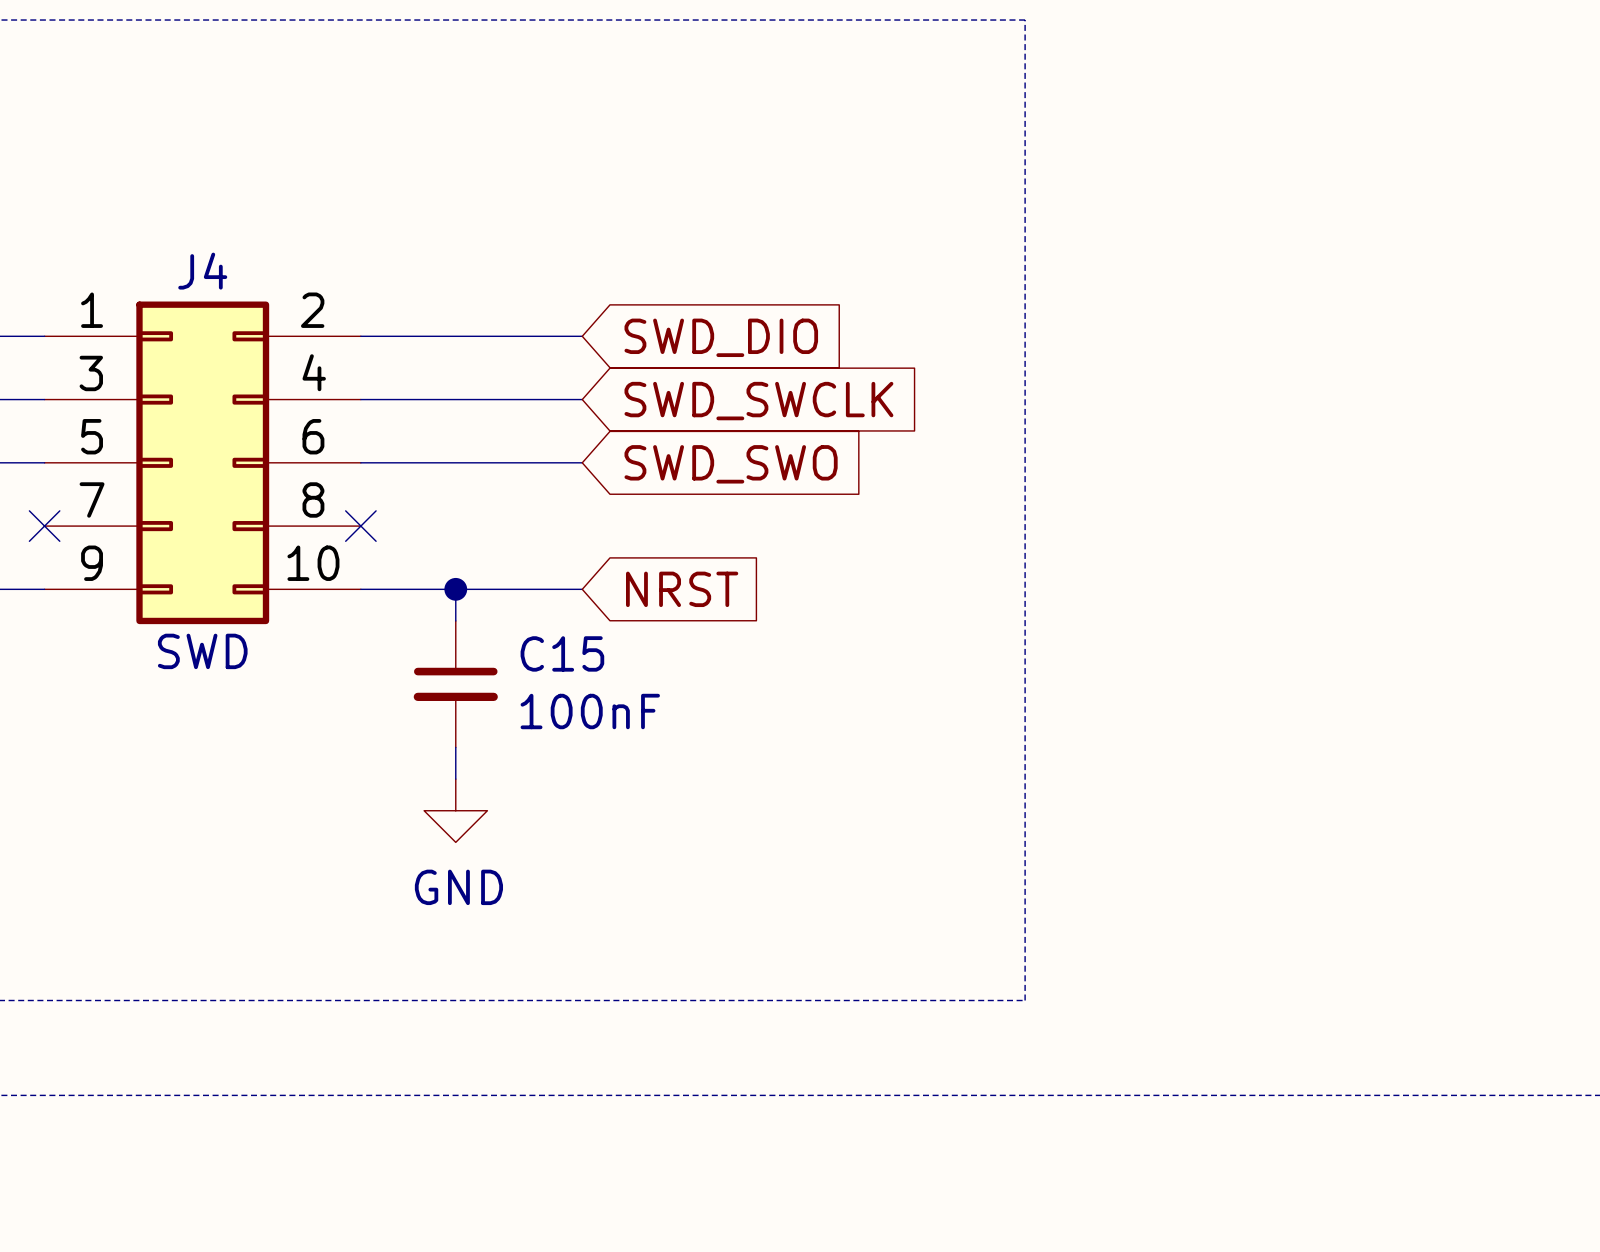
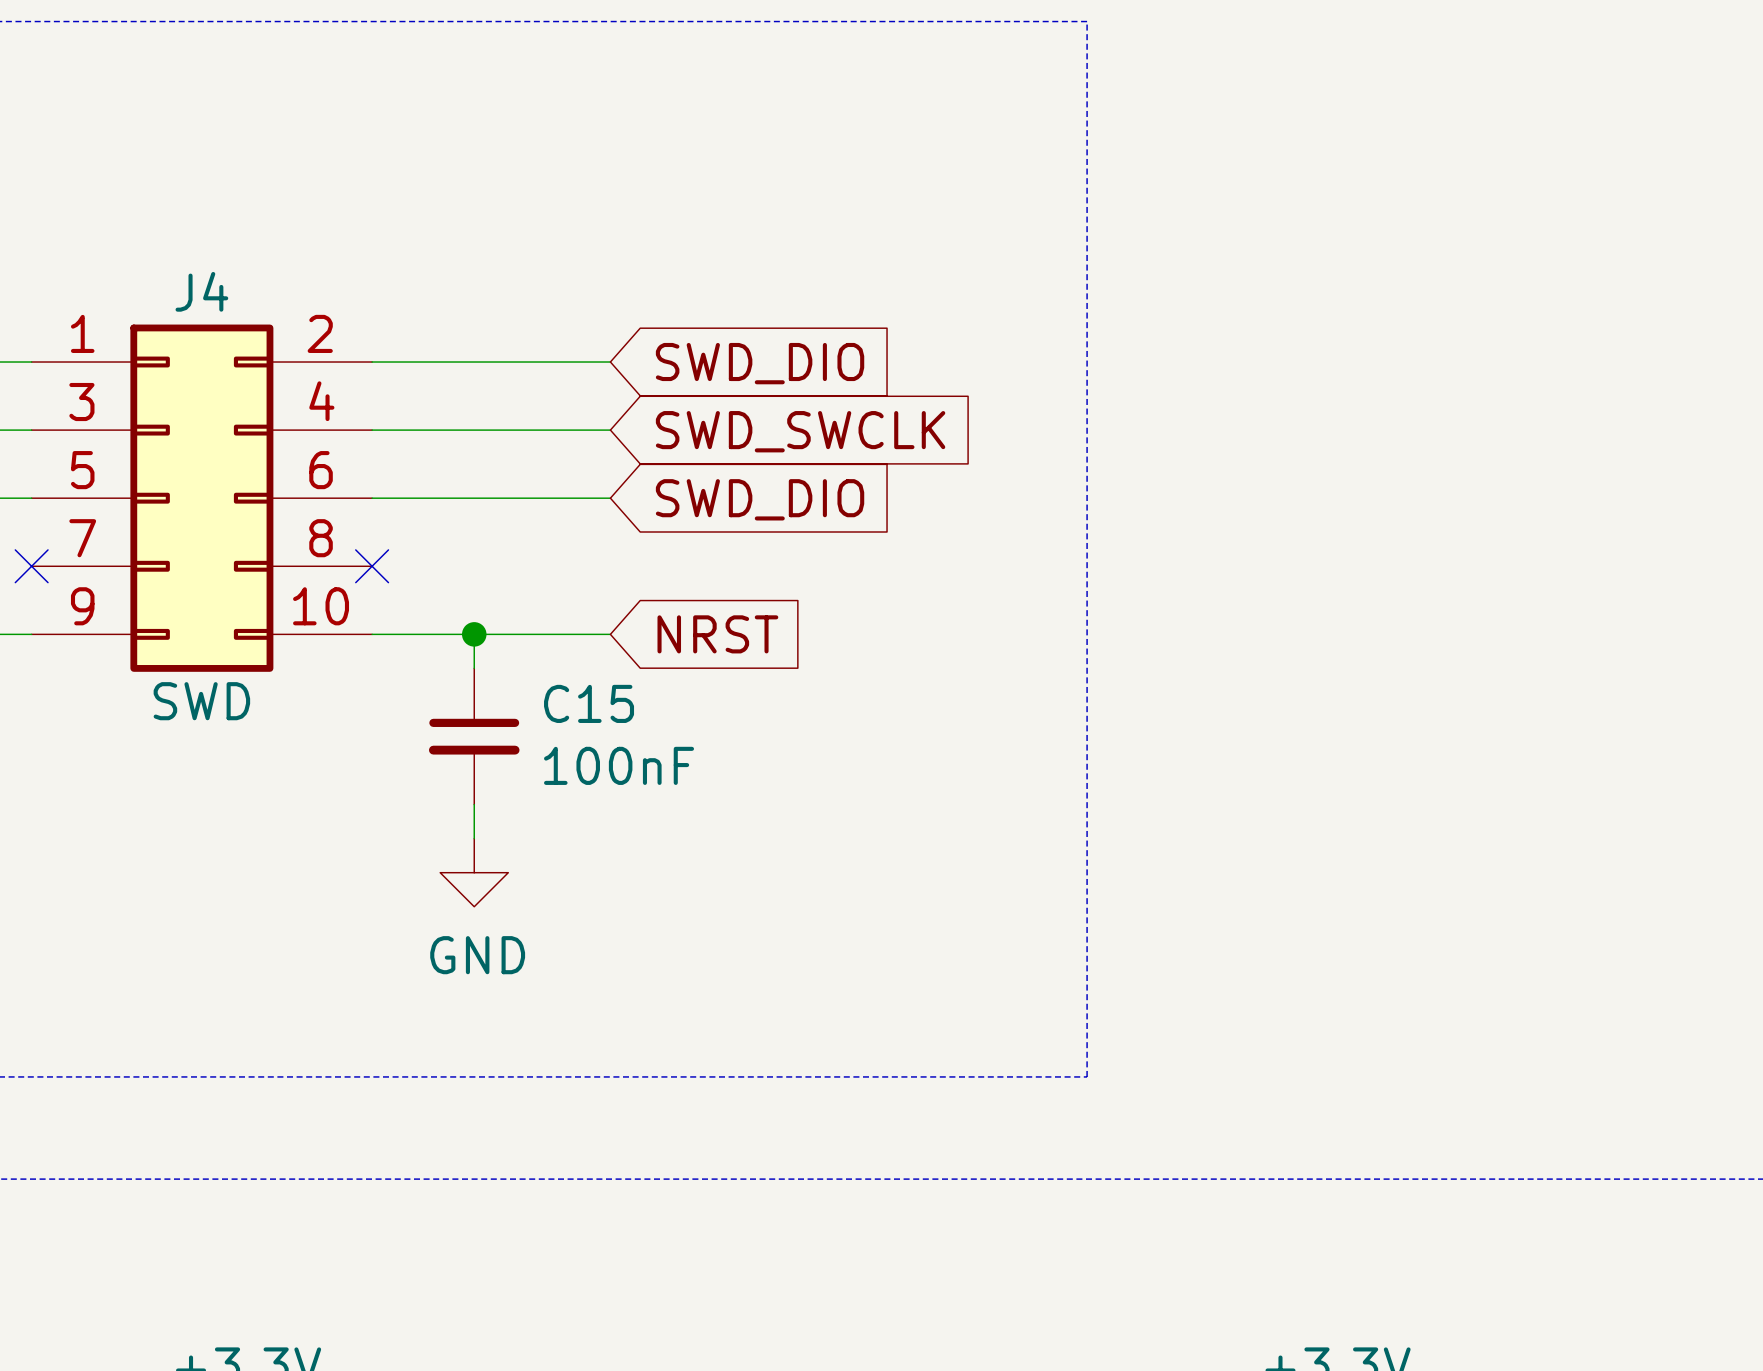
global label: SWD_SWO (731, 464) -> SWD_DIO (760, 499)

